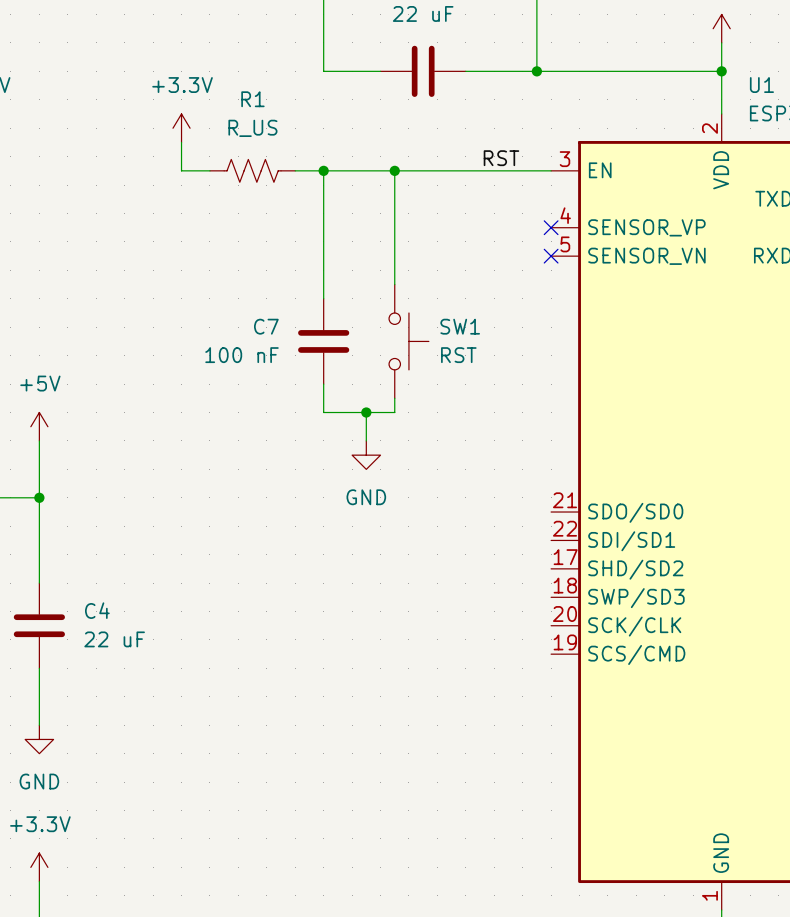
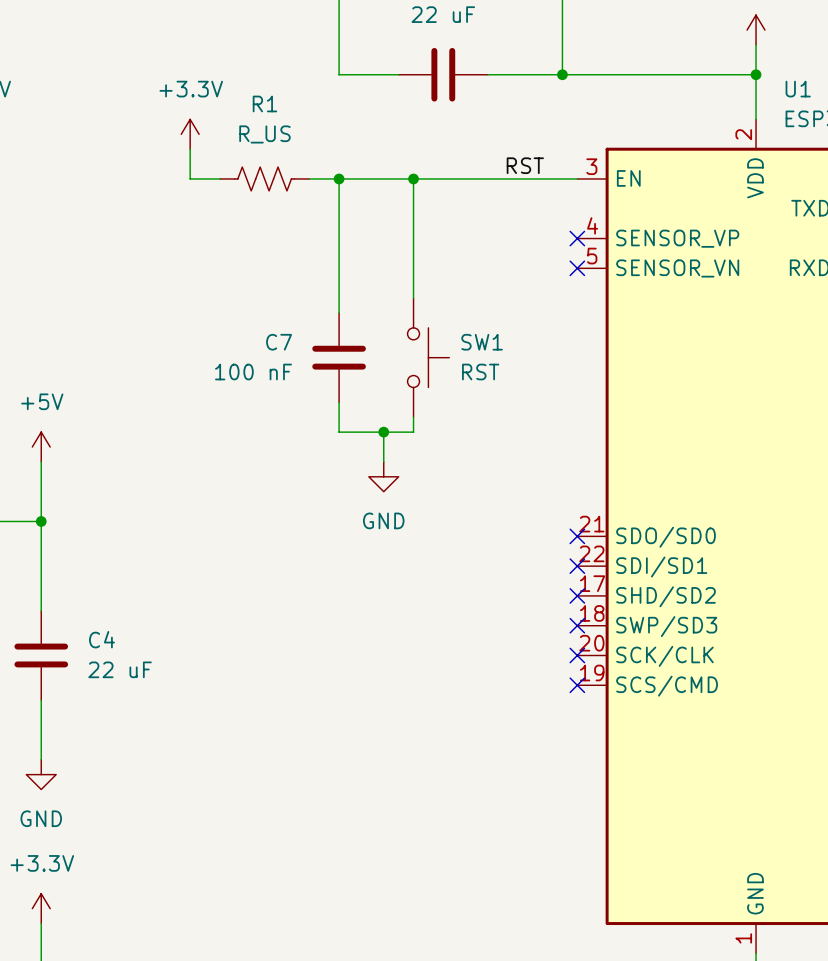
no-connect mark: none -> (577, 536)
no-connect mark: none -> (577, 566)
no-connect mark: none -> (577, 595)
no-connect mark: none -> (577, 625)
no-connect mark: none -> (577, 655)
no-connect mark: none -> (577, 685)

